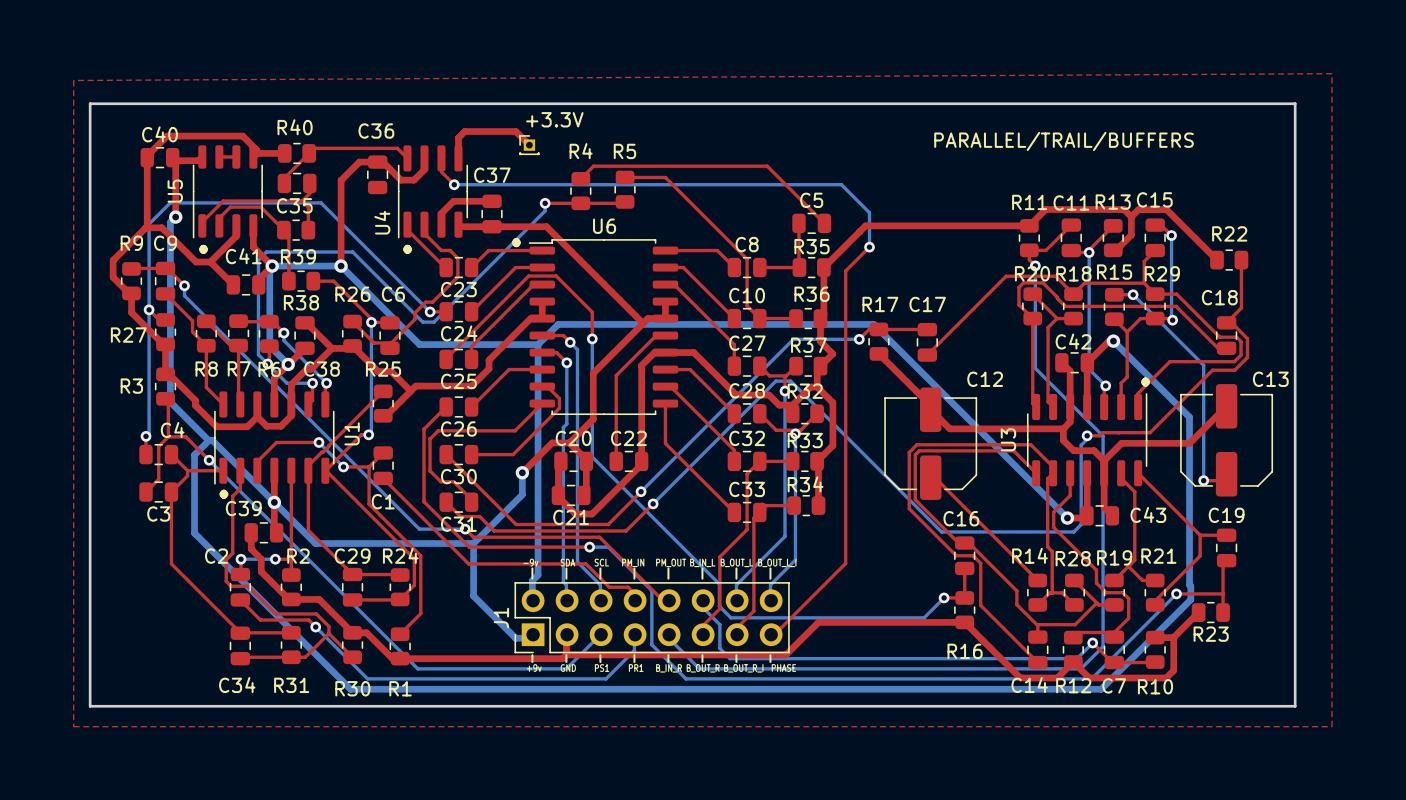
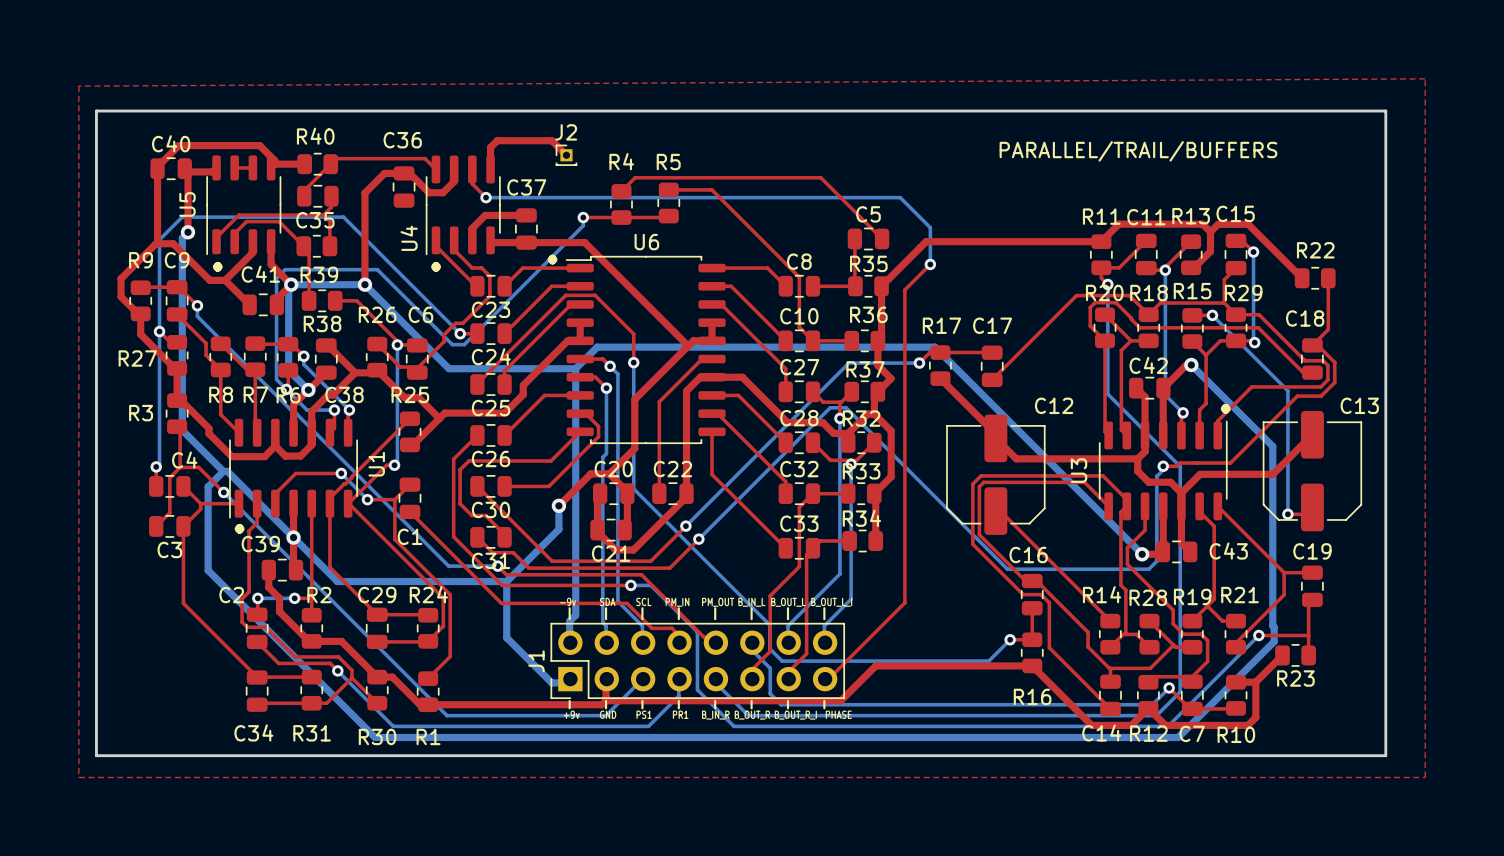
text: +3.3V (554, 119) -> none
J2 name: none -> J2 (566, 132)

